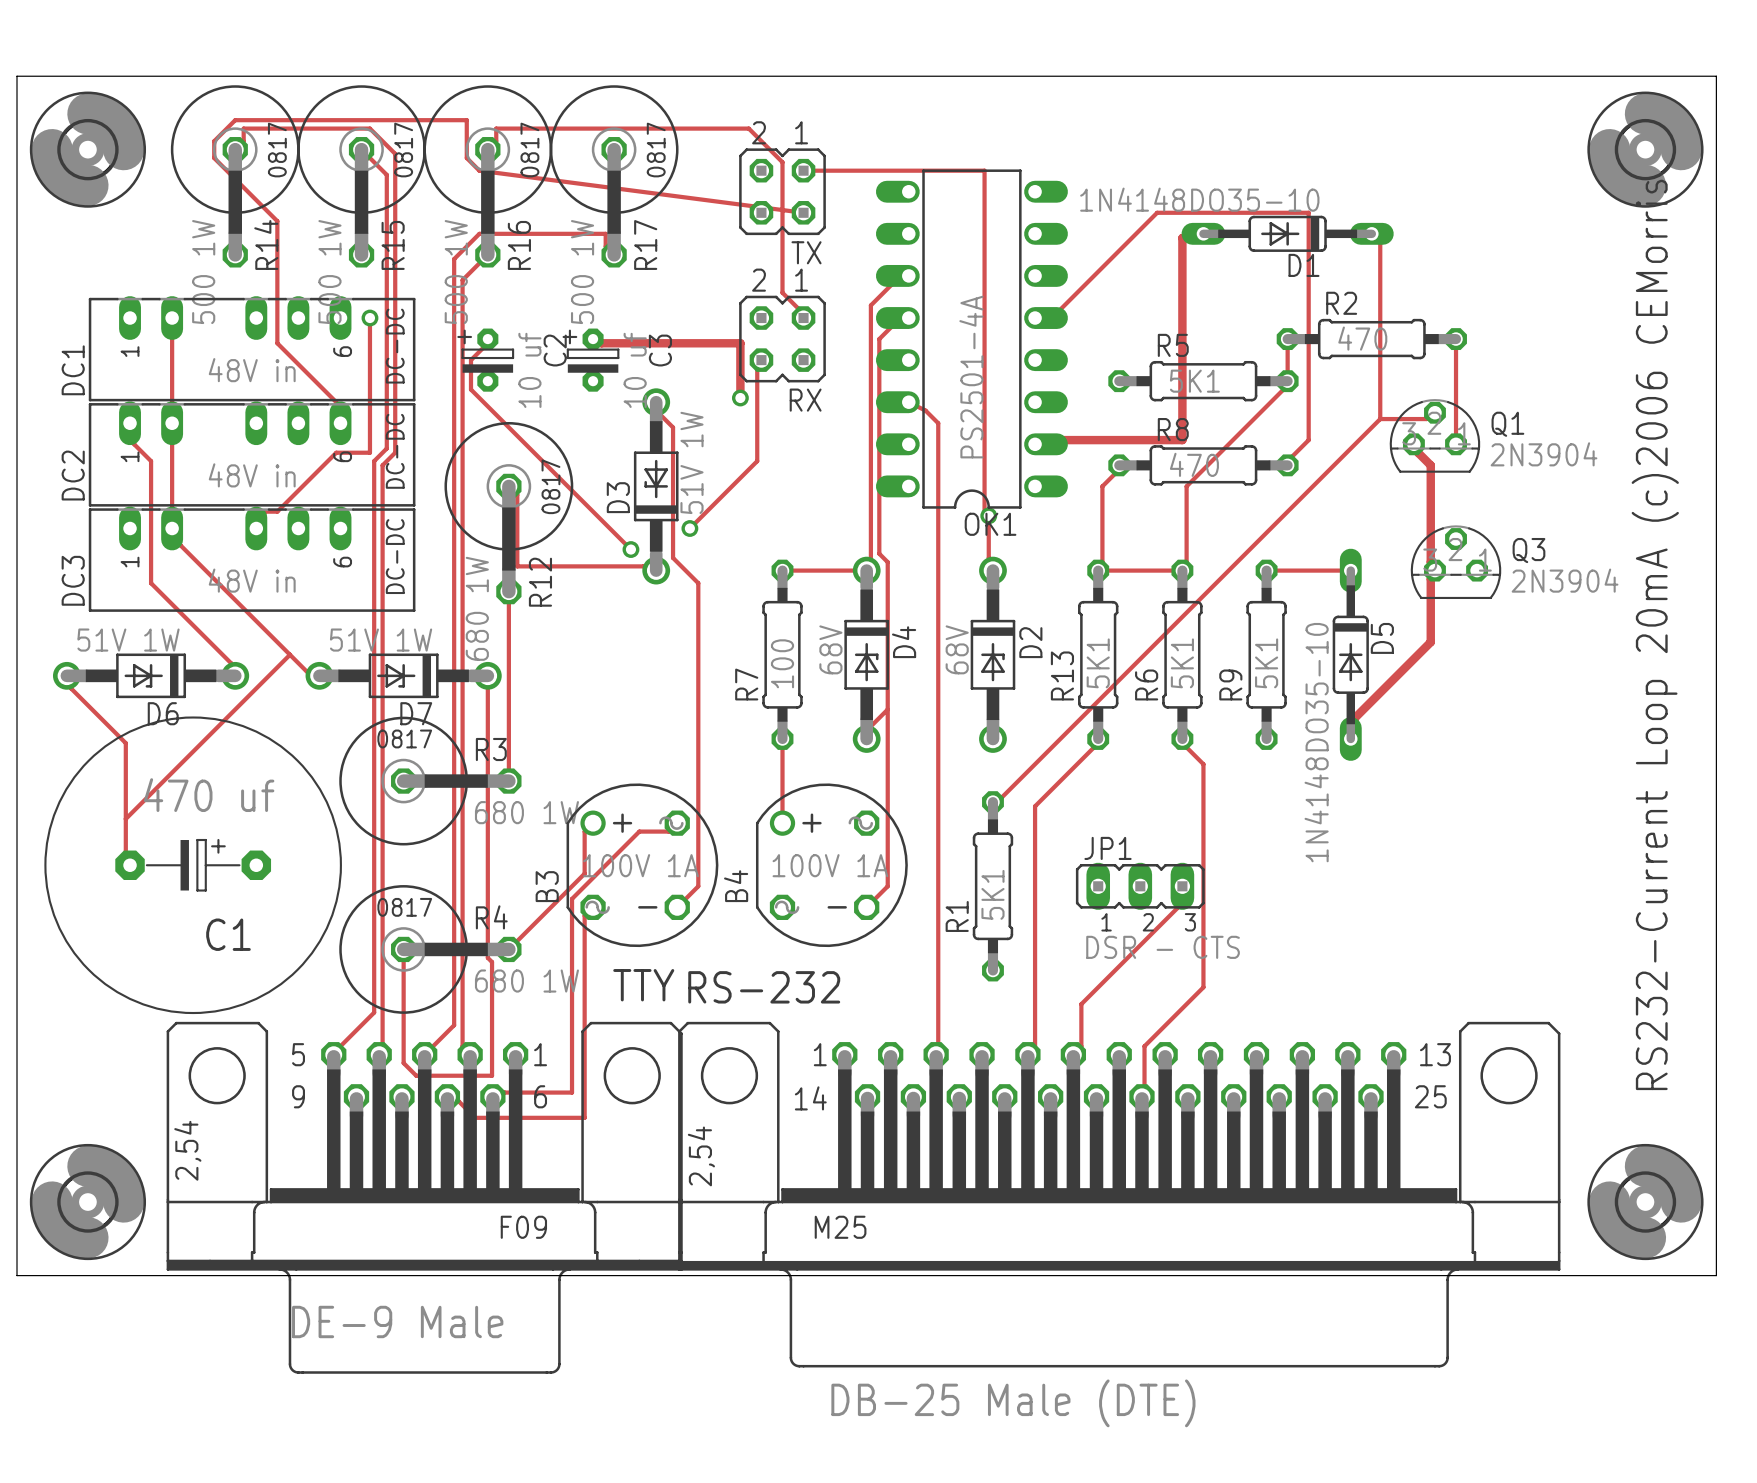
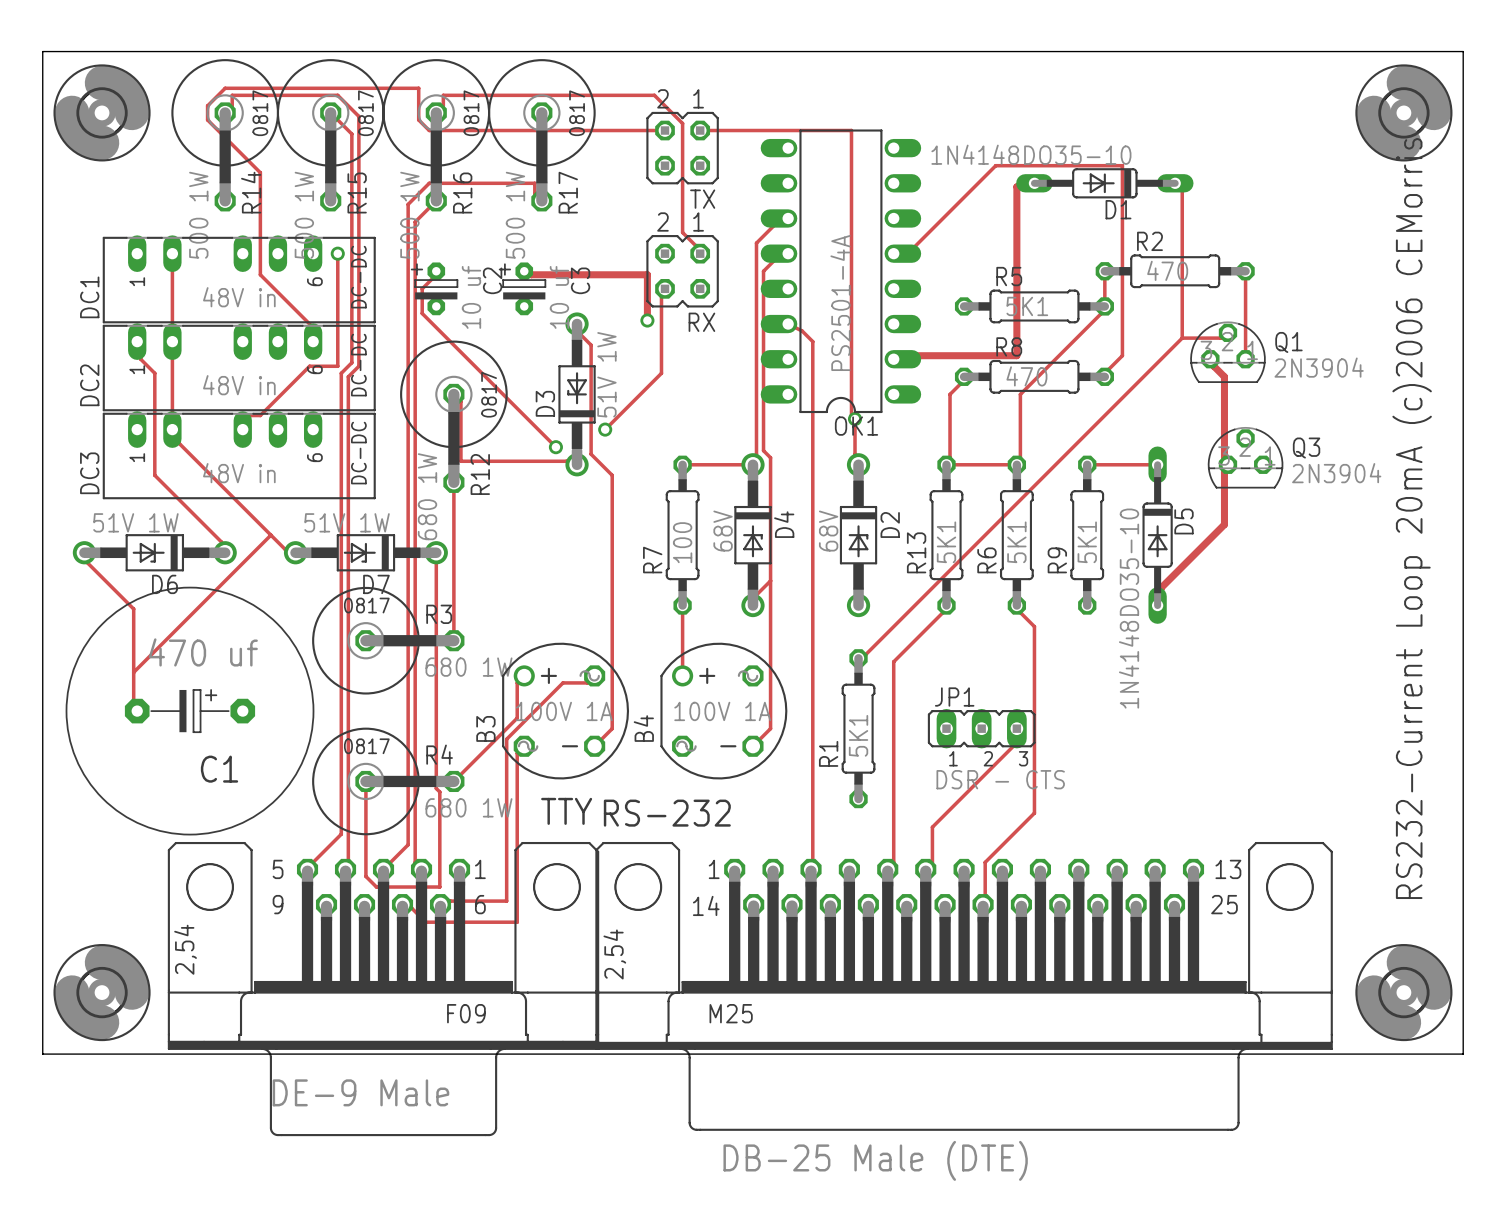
track: (479, 170) (803, 212) -> (429, 130) (665, 130)

